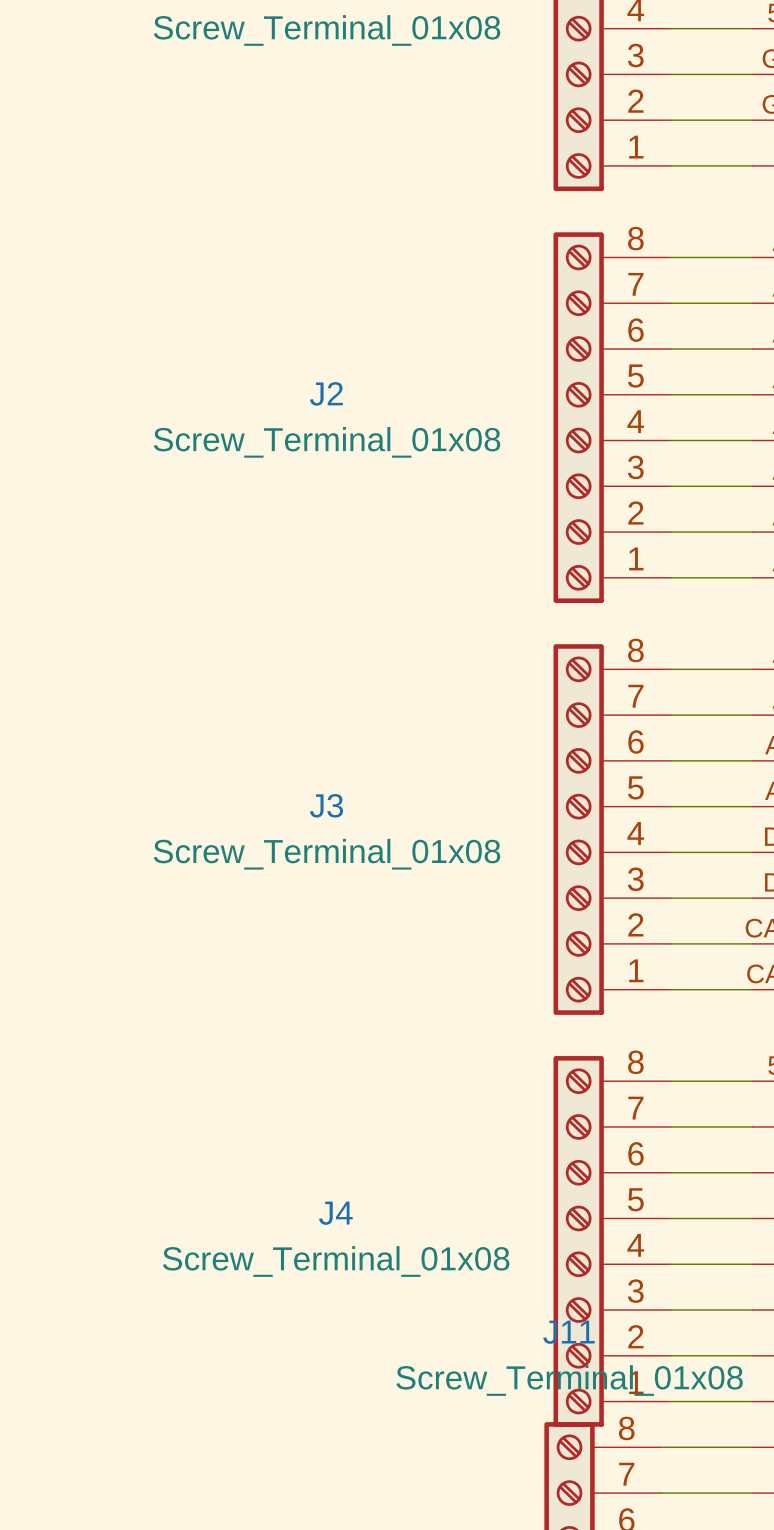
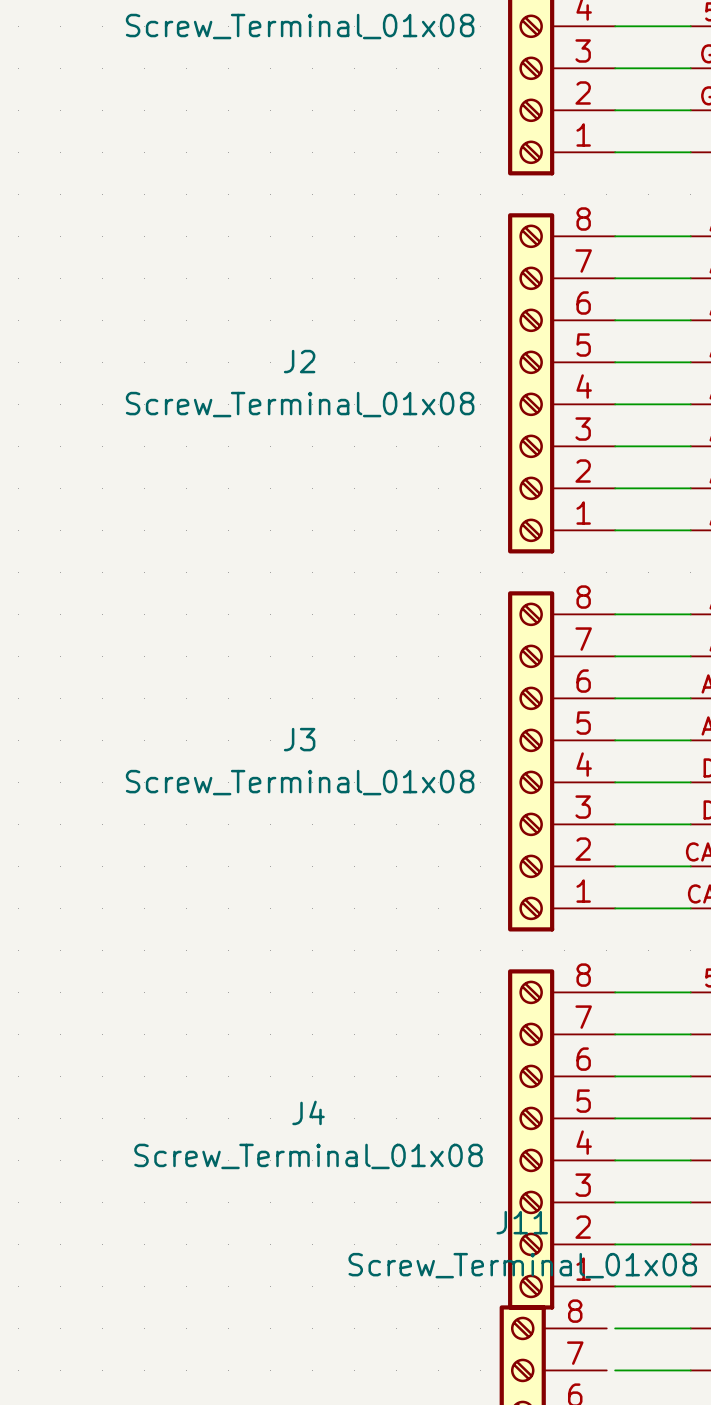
wire: (661, 1447) (670, 1447) -> none
wire: (661, 1493) (670, 1493) -> none

